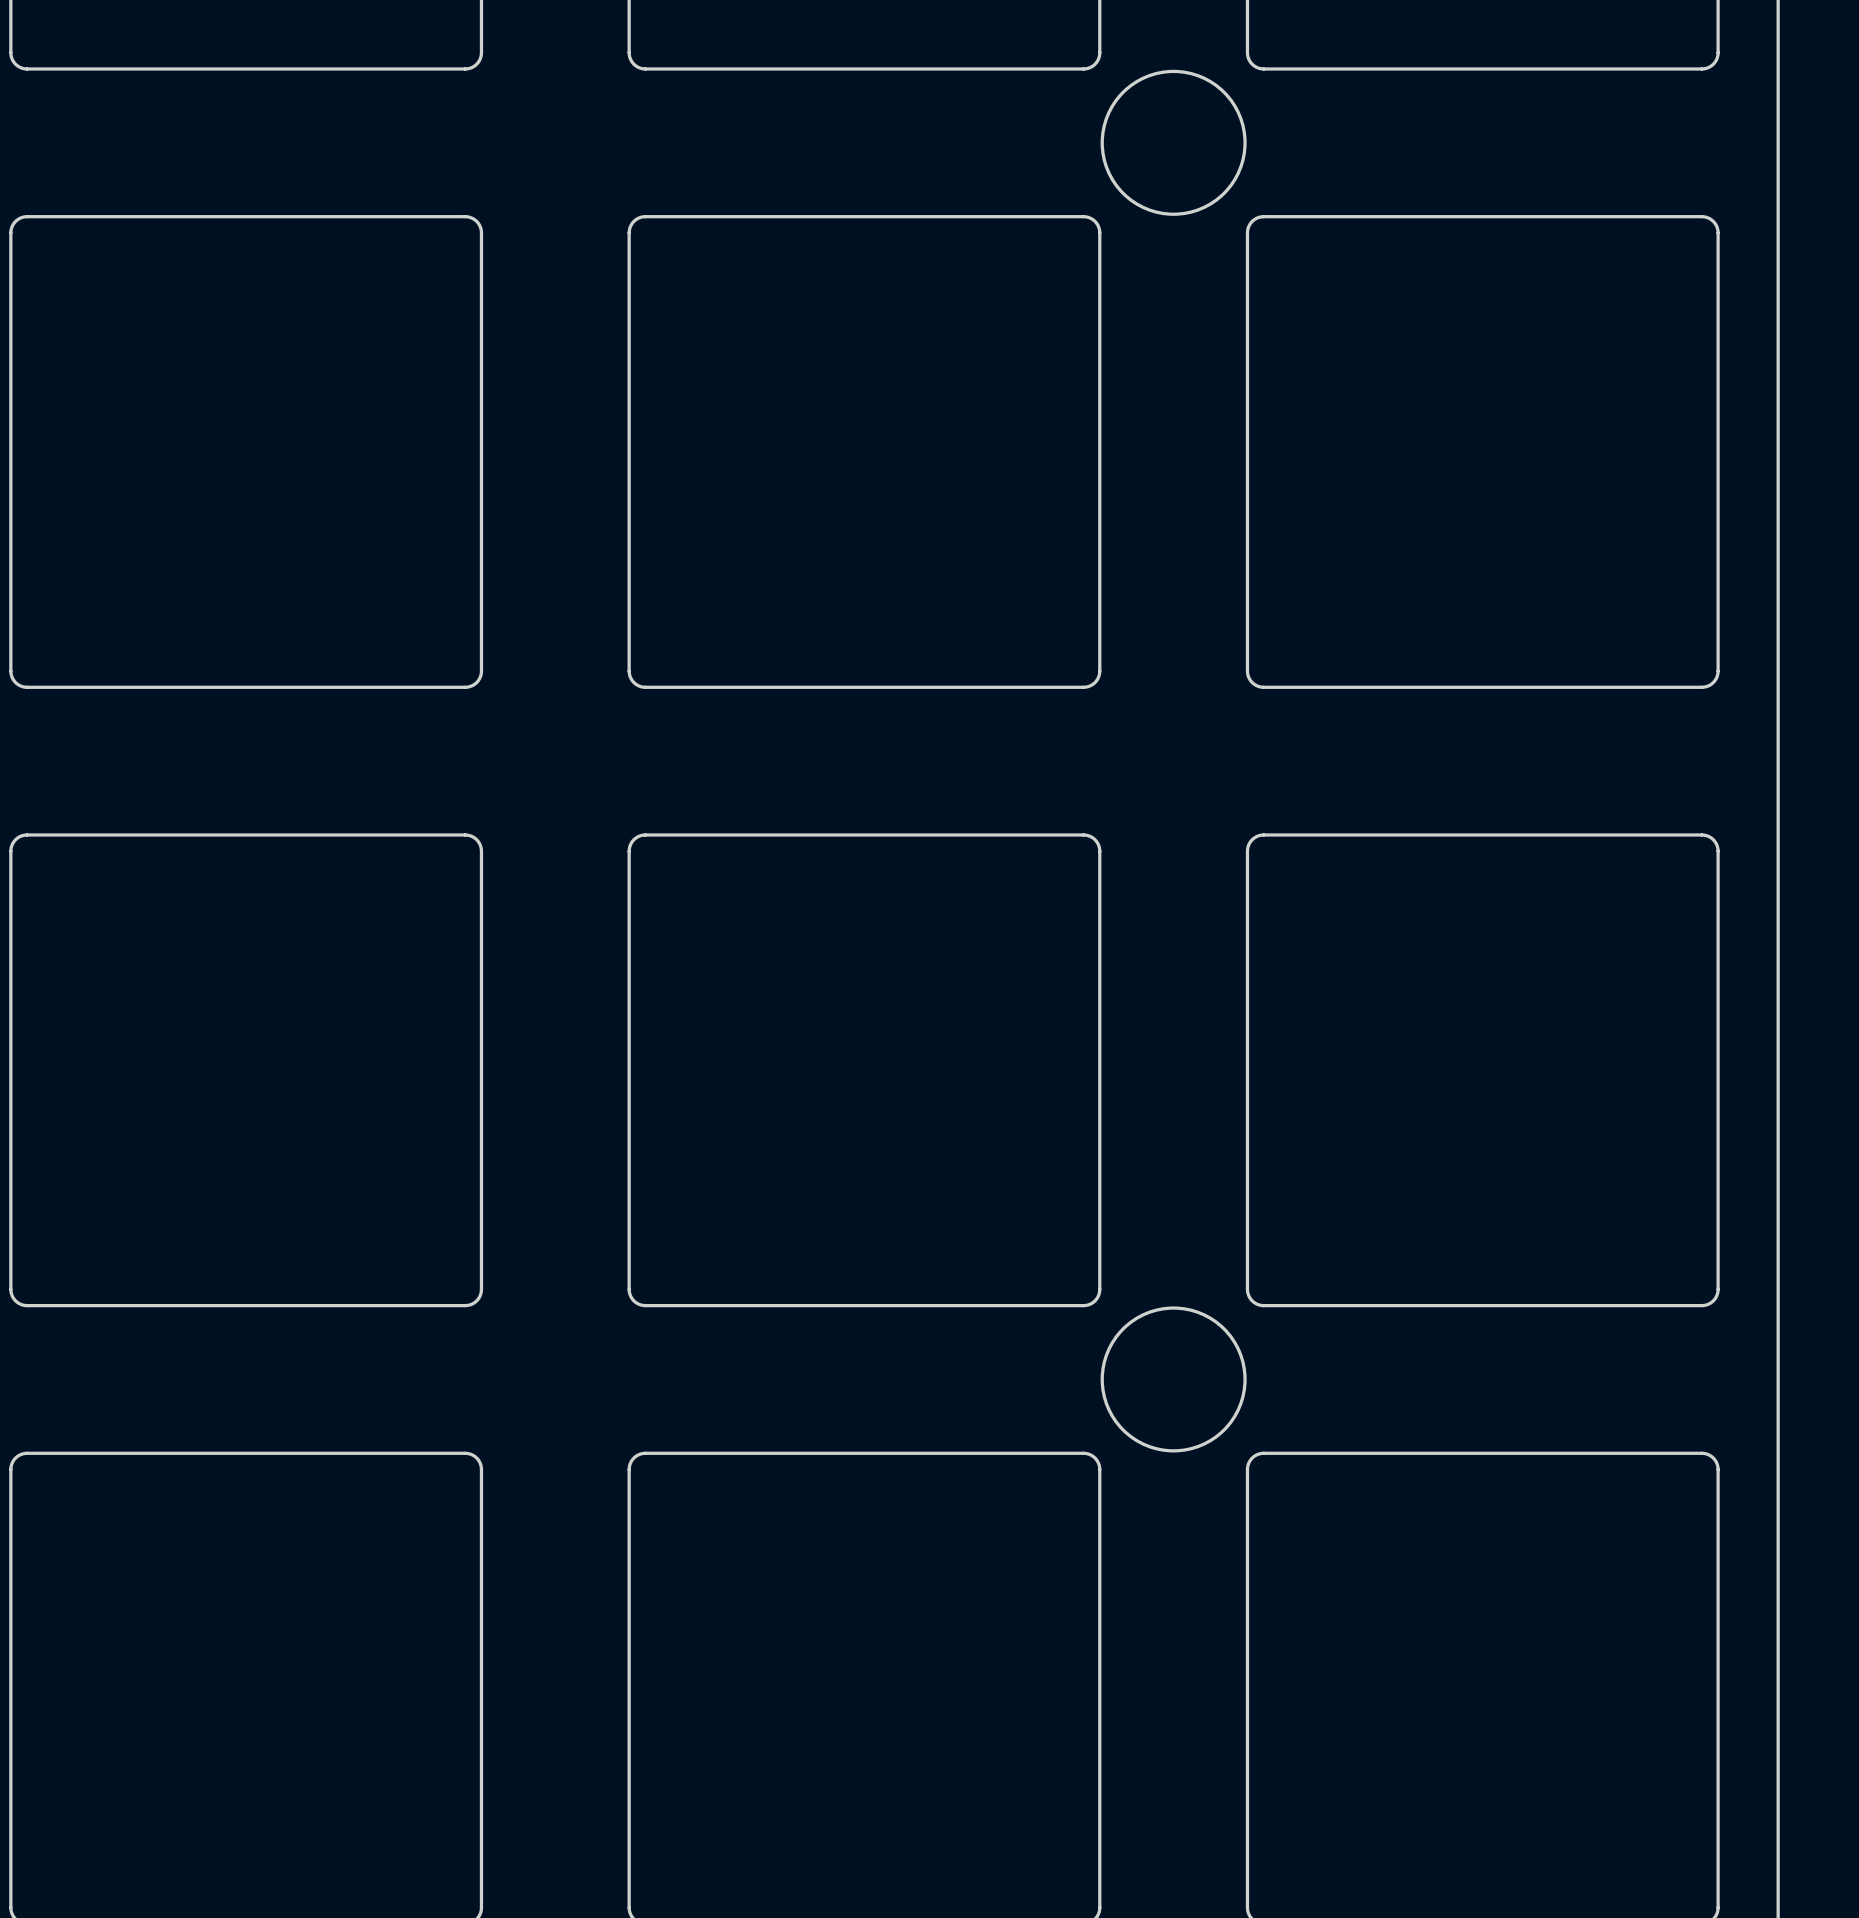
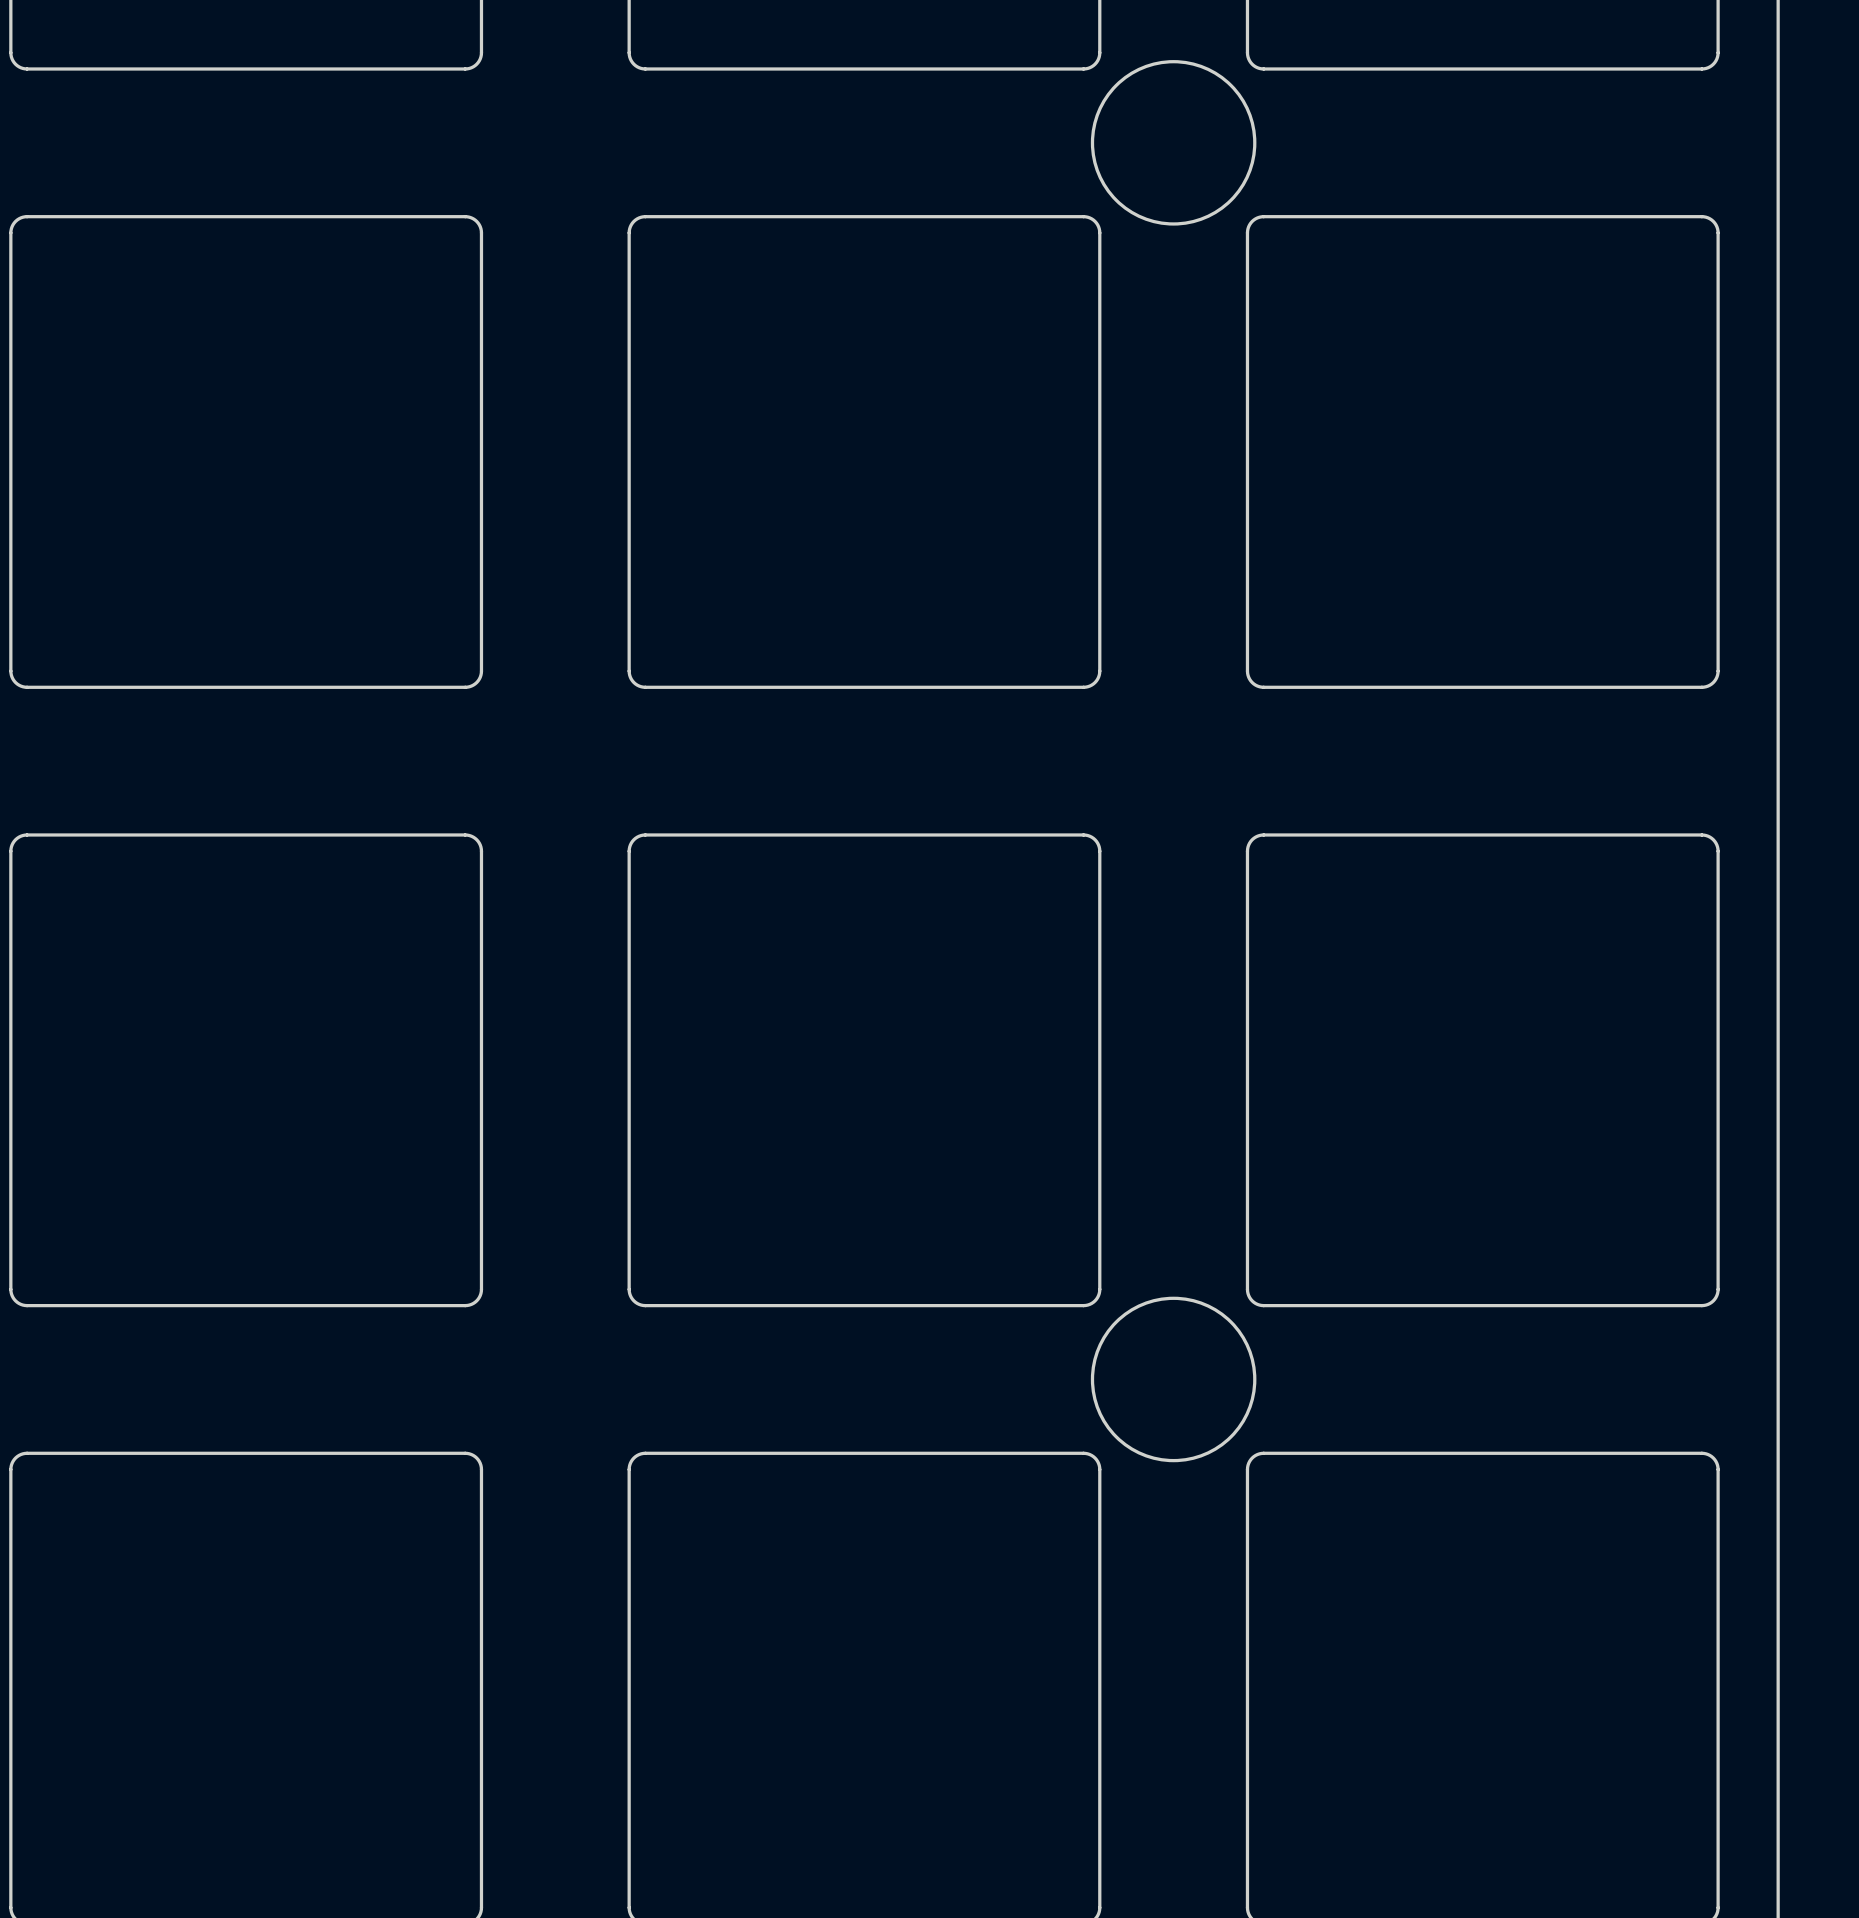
round board edge size: [1100, 69, 1247, 216] -> [1090, 60, 1257, 226]
round board edge size: [1100, 1306, 1247, 1453] -> [1090, 1296, 1257, 1463]

